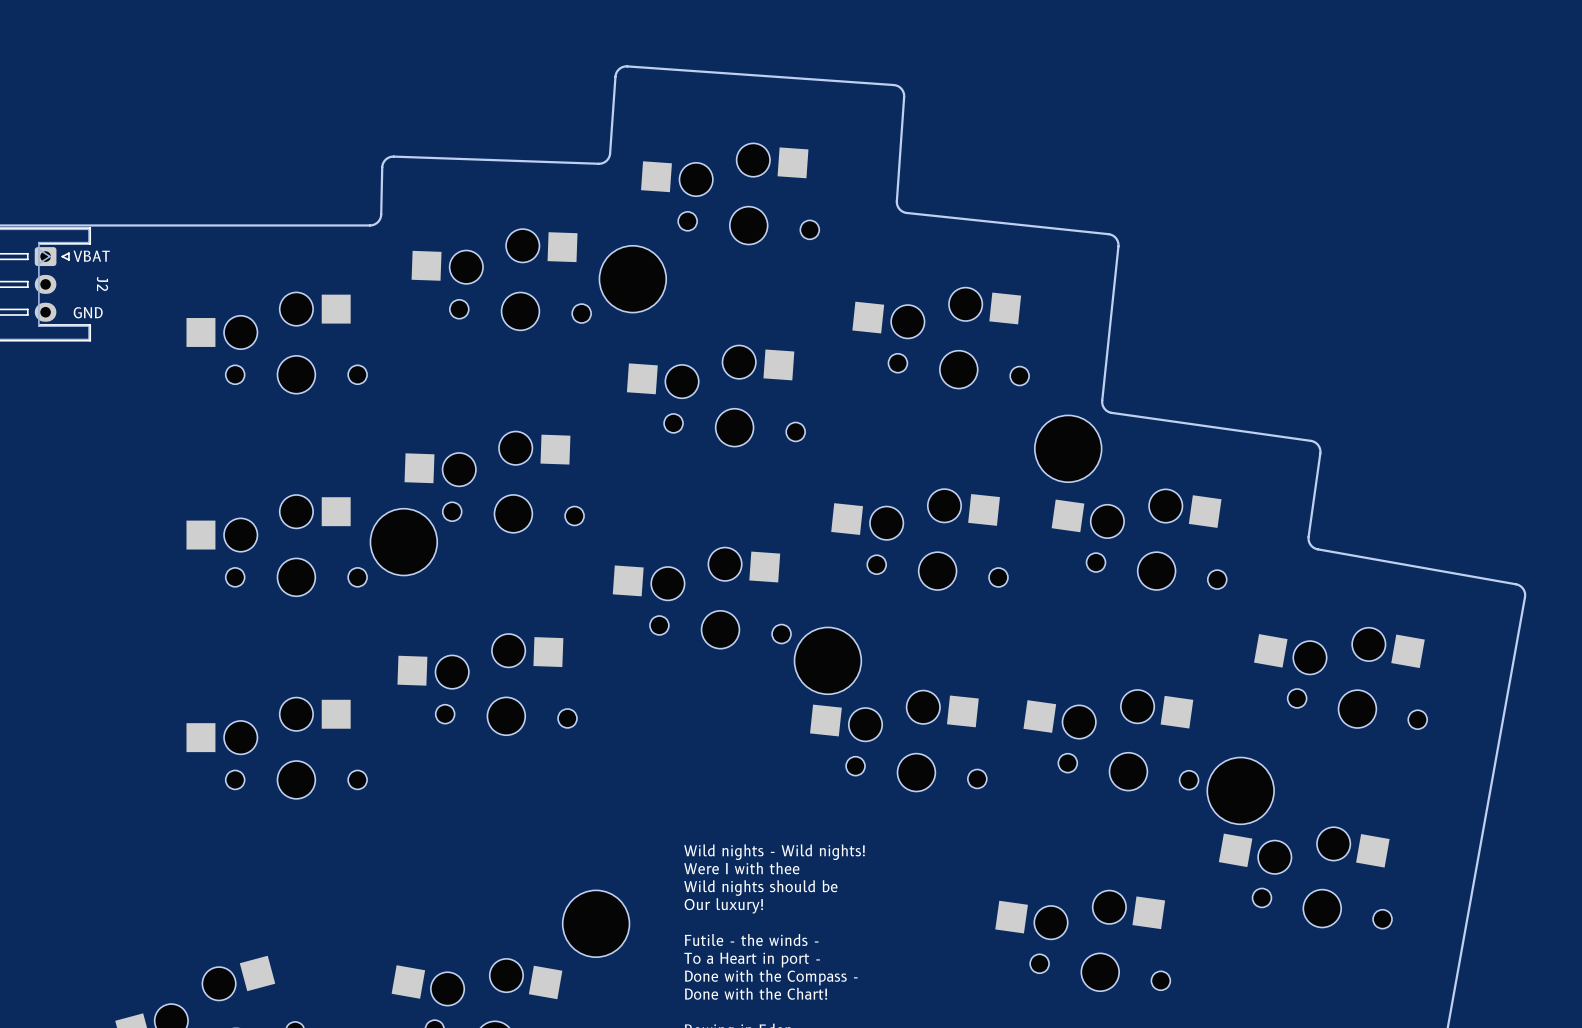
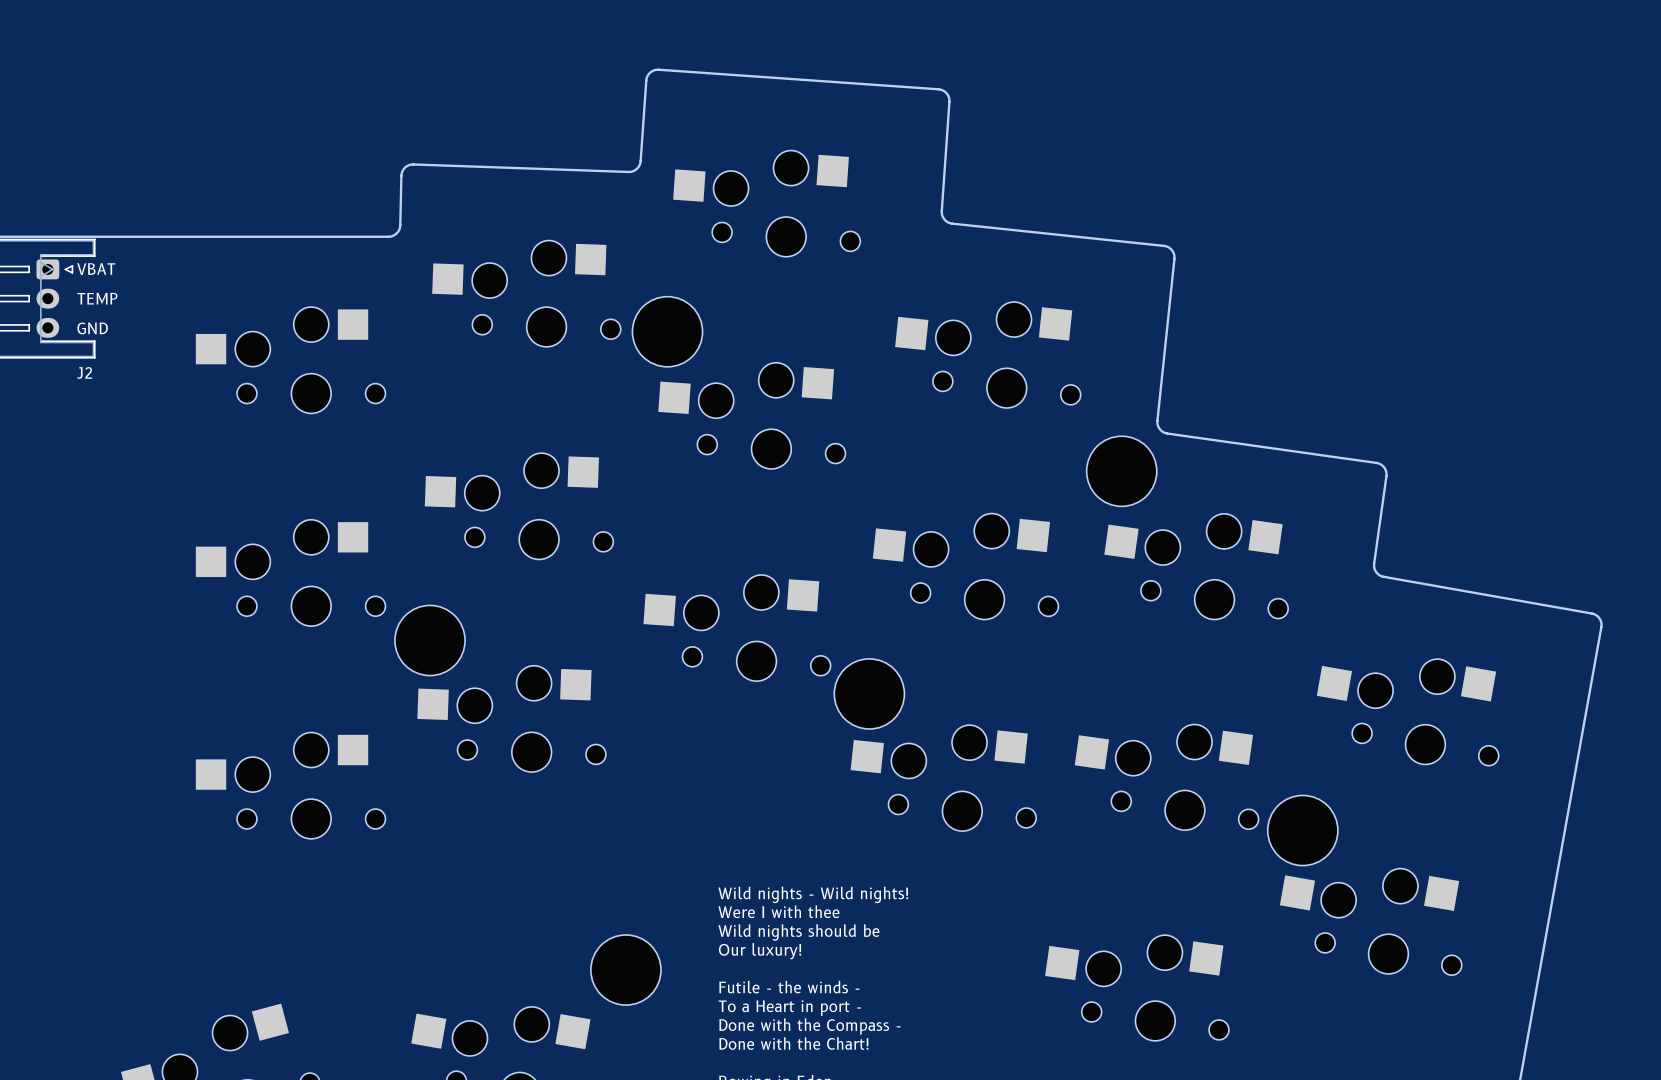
part position: (632, 279) -> (667, 331)
J2 name rotation: 0° (102, 283) -> 90° counterclockwise (84, 372)
J2 name position: J2 (102, 283) -> J2 (84, 372)
text: none -> TEMP (97, 298)
part position: (403, 542) -> (430, 640)

